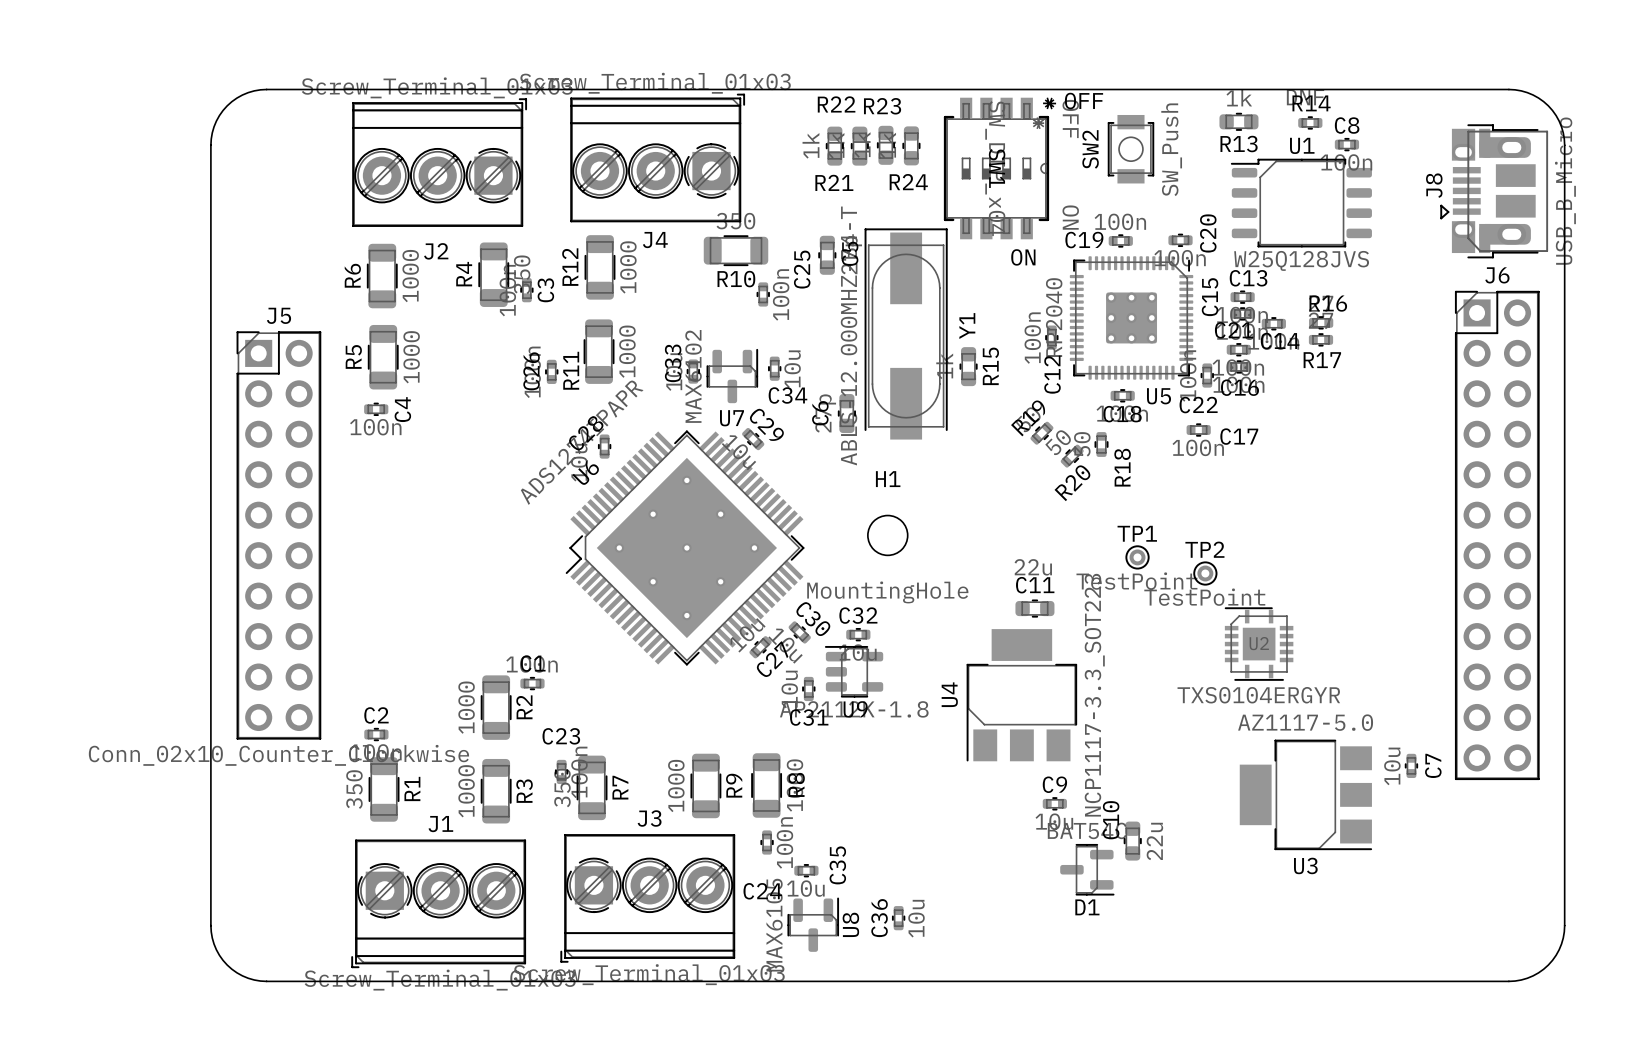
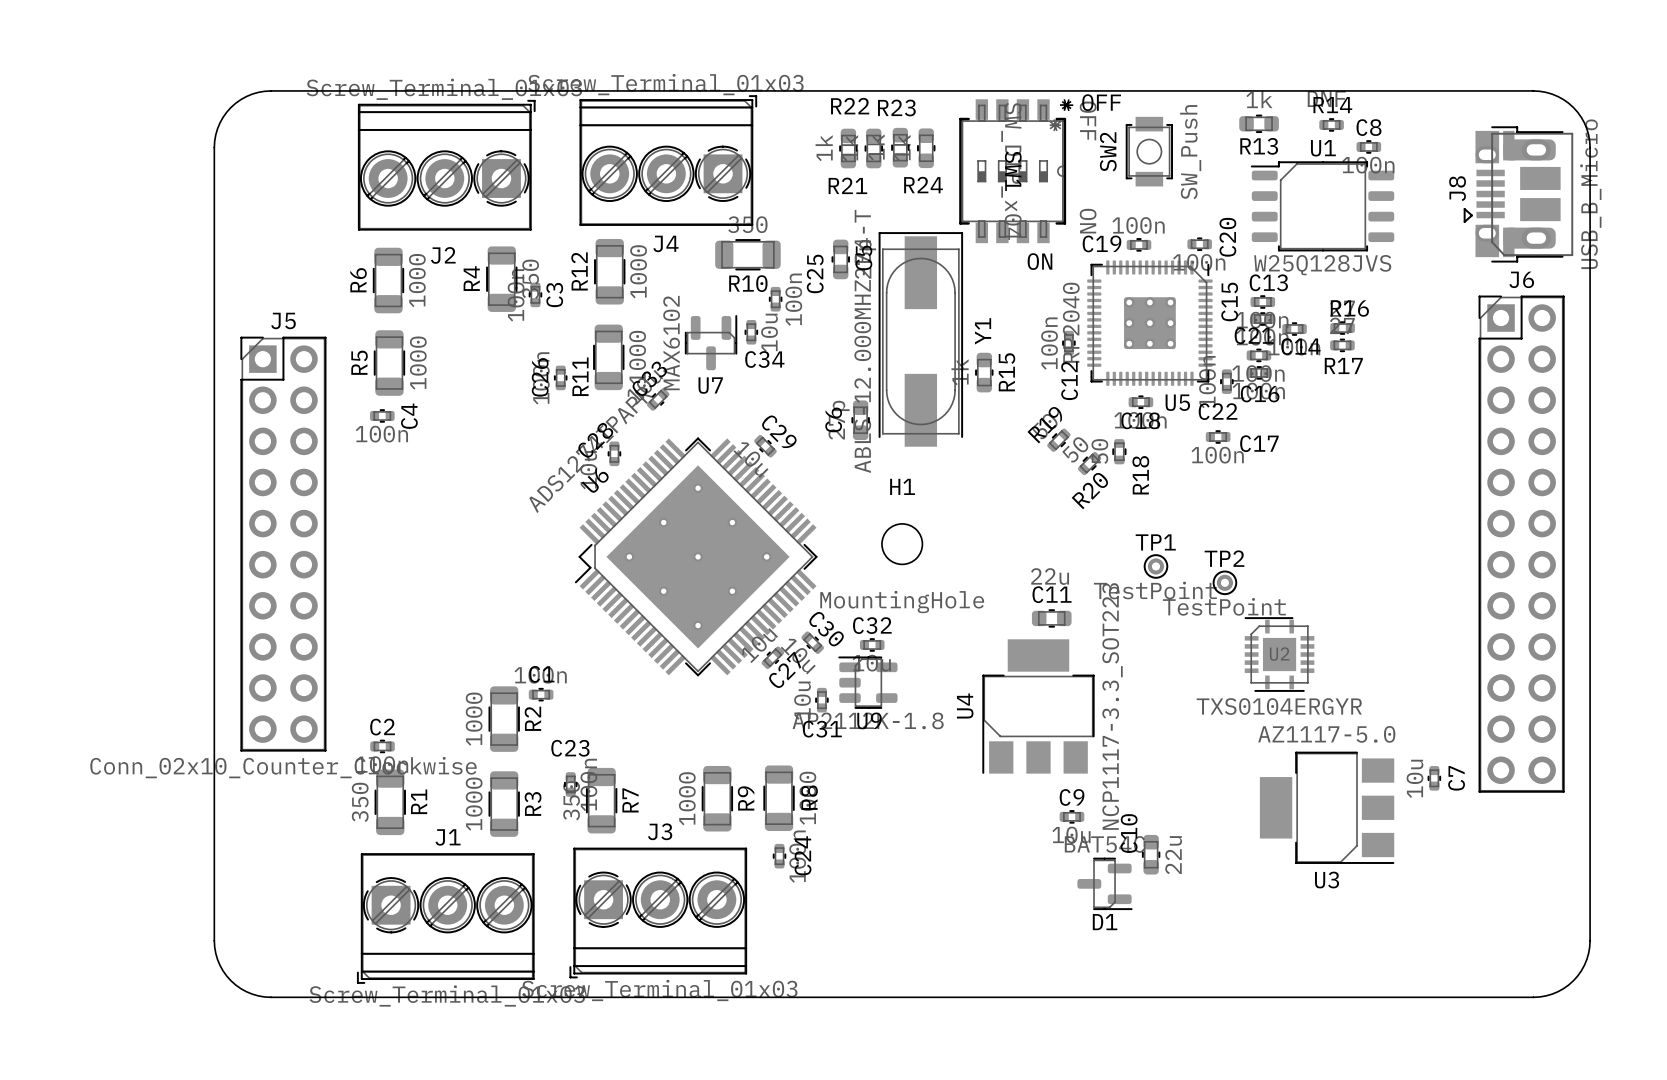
C34 position: (774, 368) -> (751, 332)
C33 rotation: 0° (693, 371) -> 45° clockwise (658, 399)
C33 position: (693, 371) -> (658, 399)
U7 position: (732, 376) -> (711, 342)
C35: 10u (806, 870) -> none
C24 name rotation: 0° (762, 891) -> 90° counterclockwise (803, 855)
C24 name position: C24 (762, 891) -> C24 (803, 855)
C36: 10u (898, 918) -> none
U8: MAX6105 (813, 924) -> none

